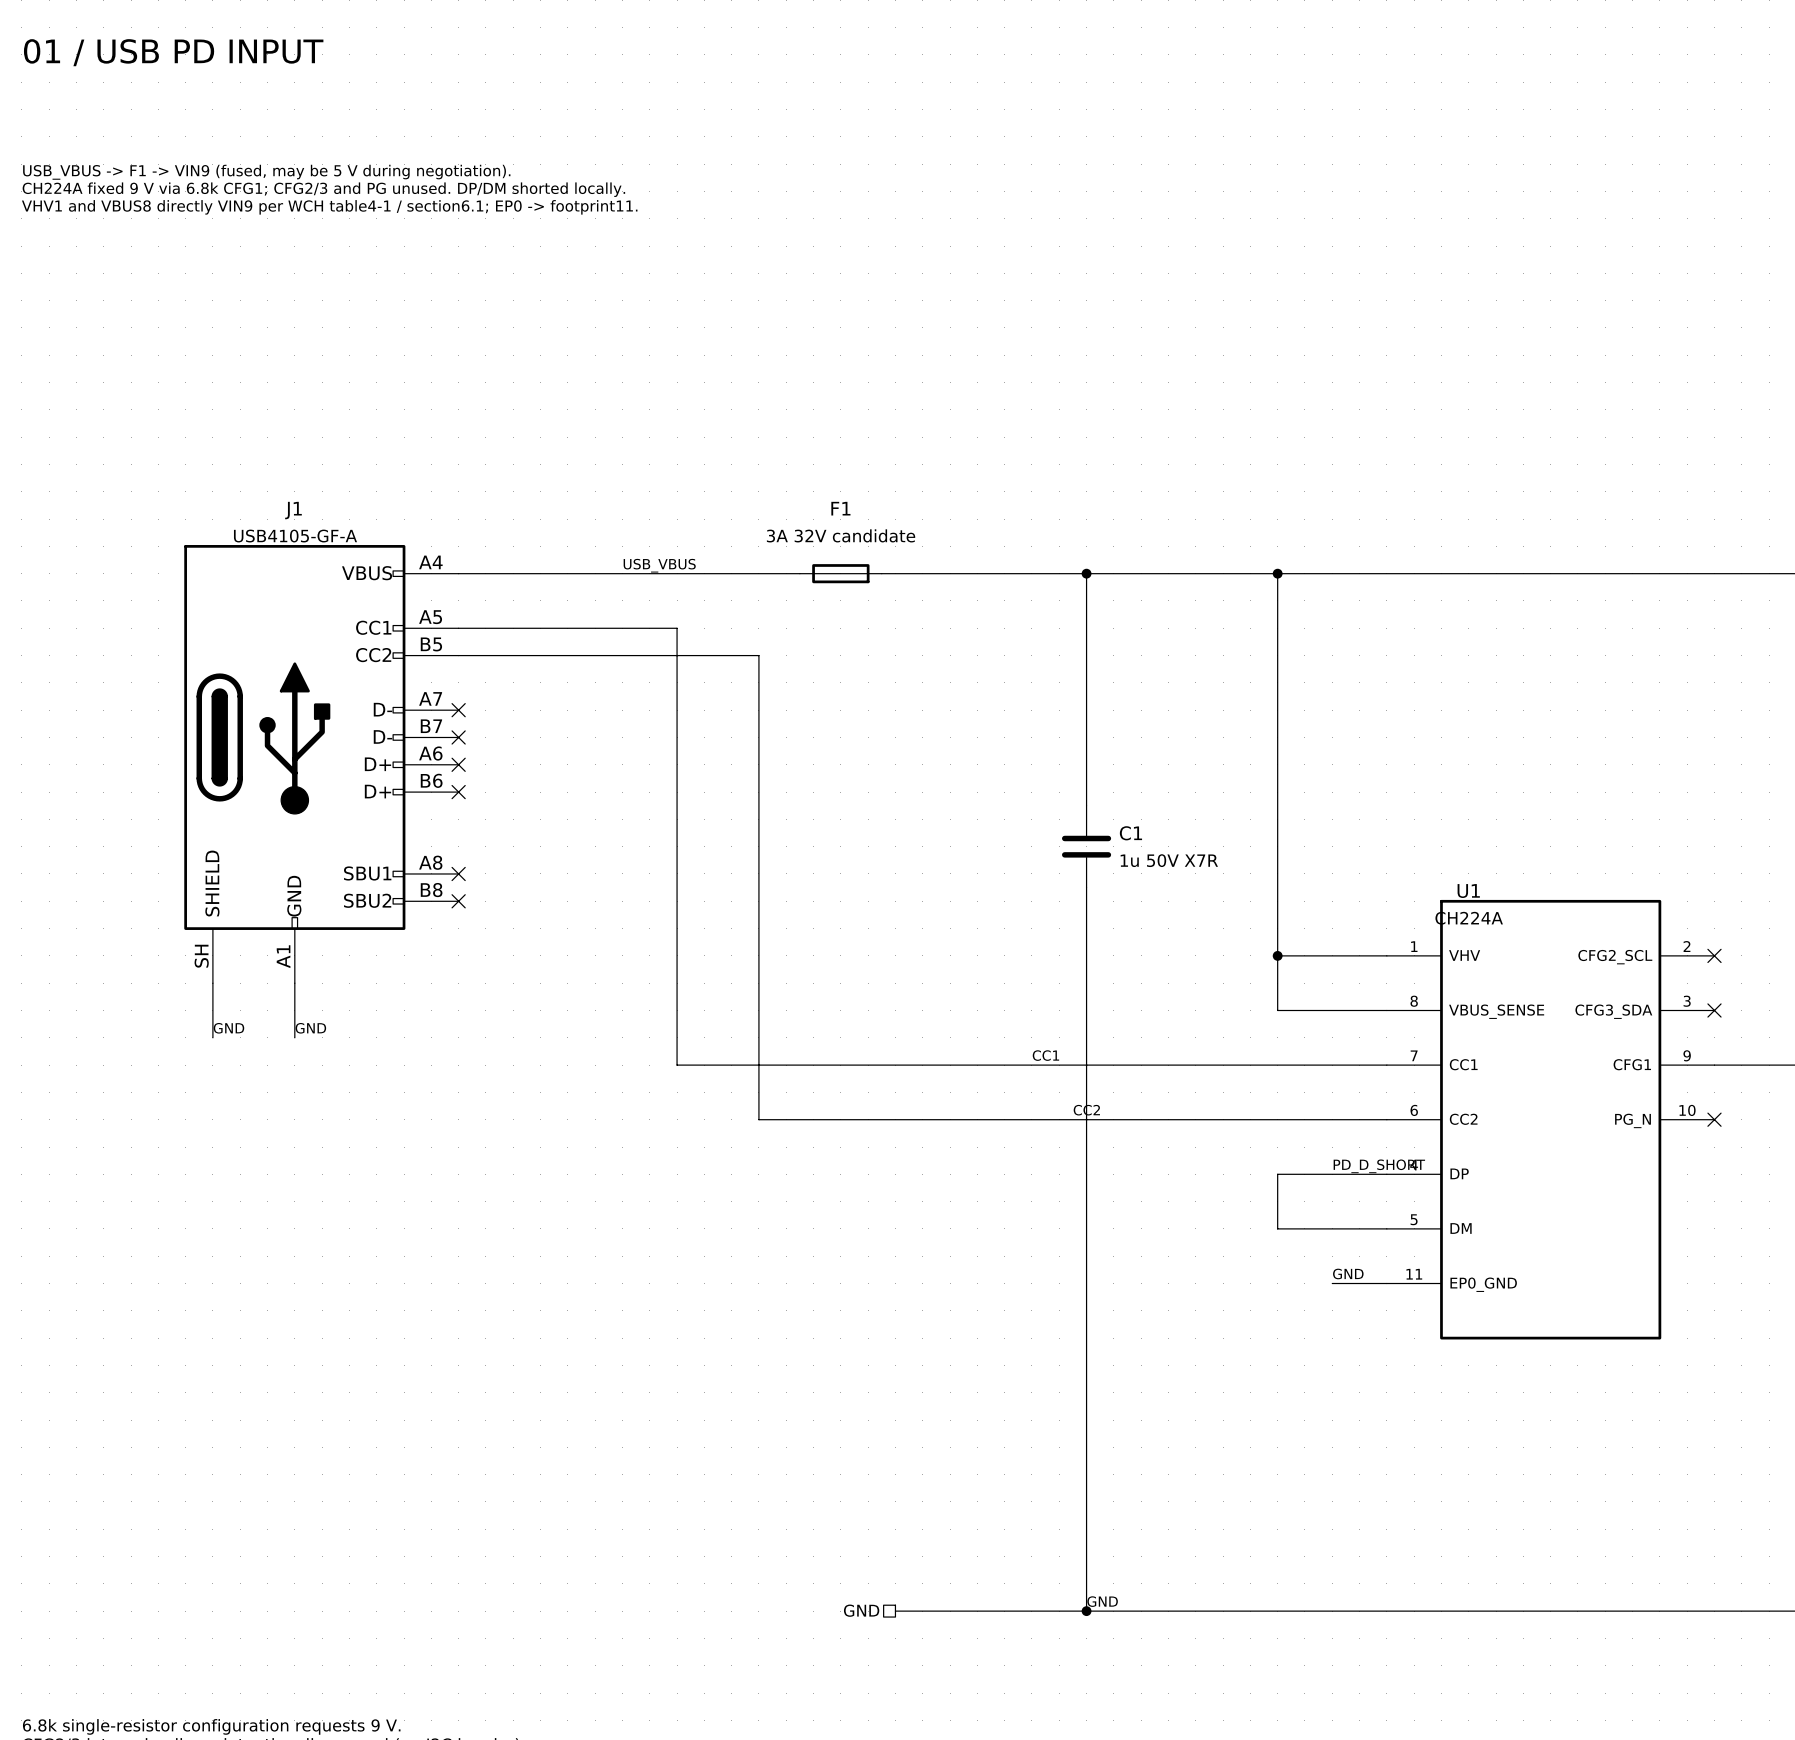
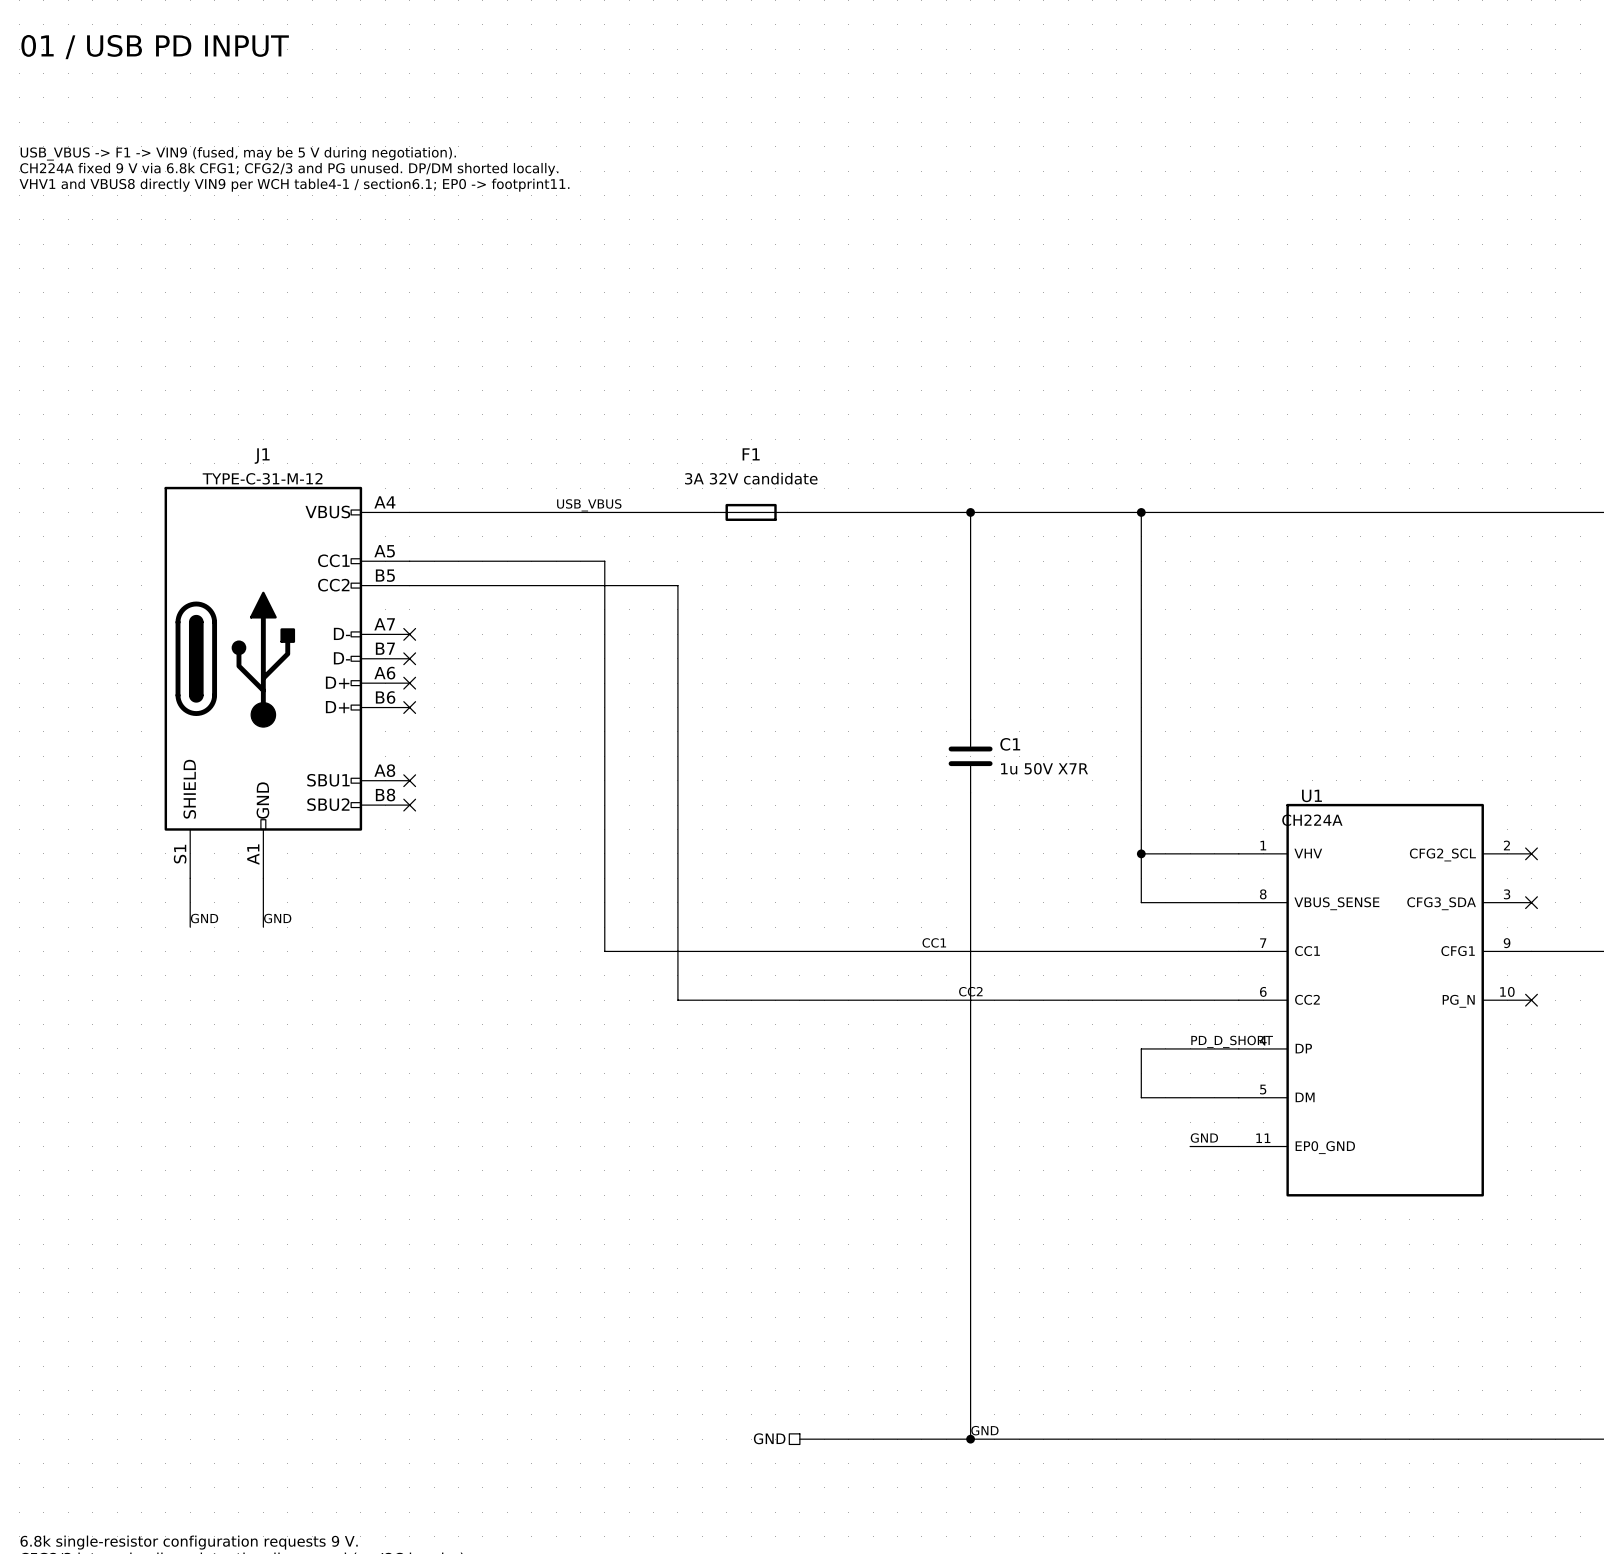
J1 value: USB4105-GF-A (295, 536) -> TYPE-C-31-M-12 (262, 478)
J1 pin number: SH (201, 956) -> S1 (180, 854)

